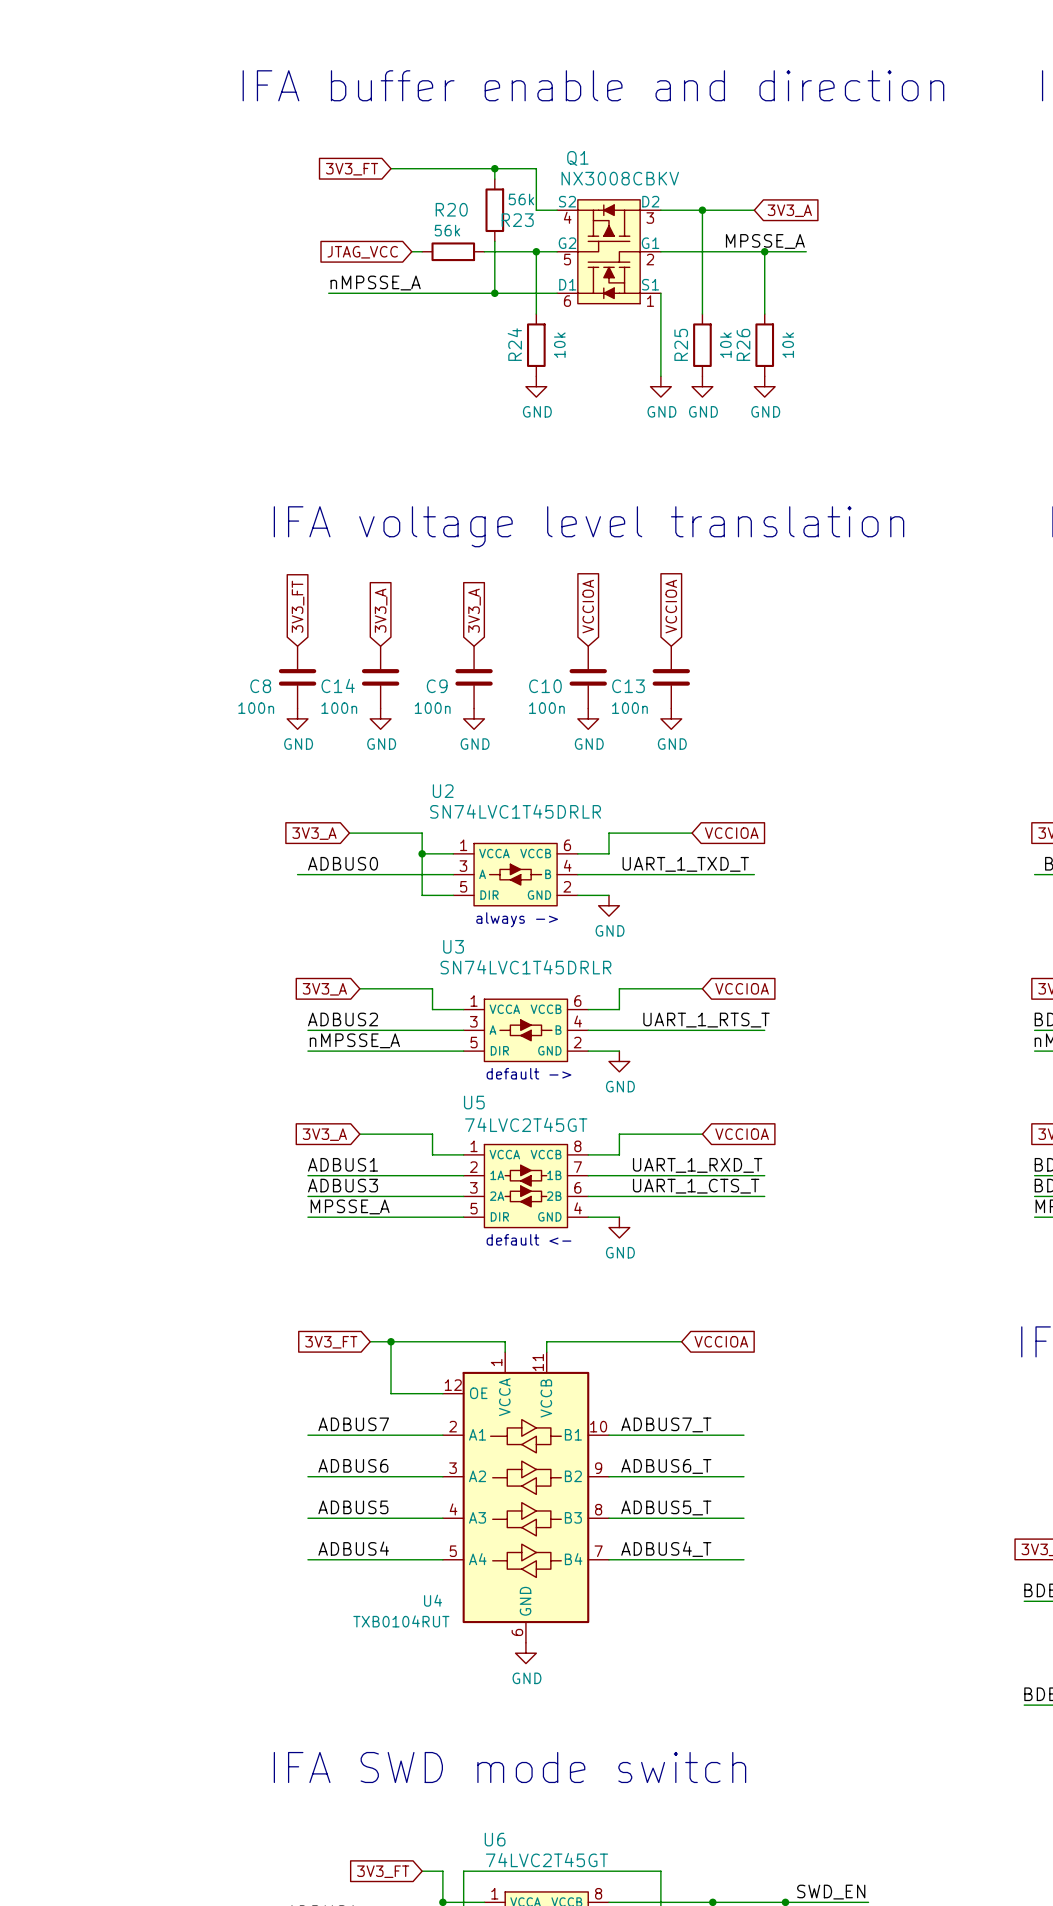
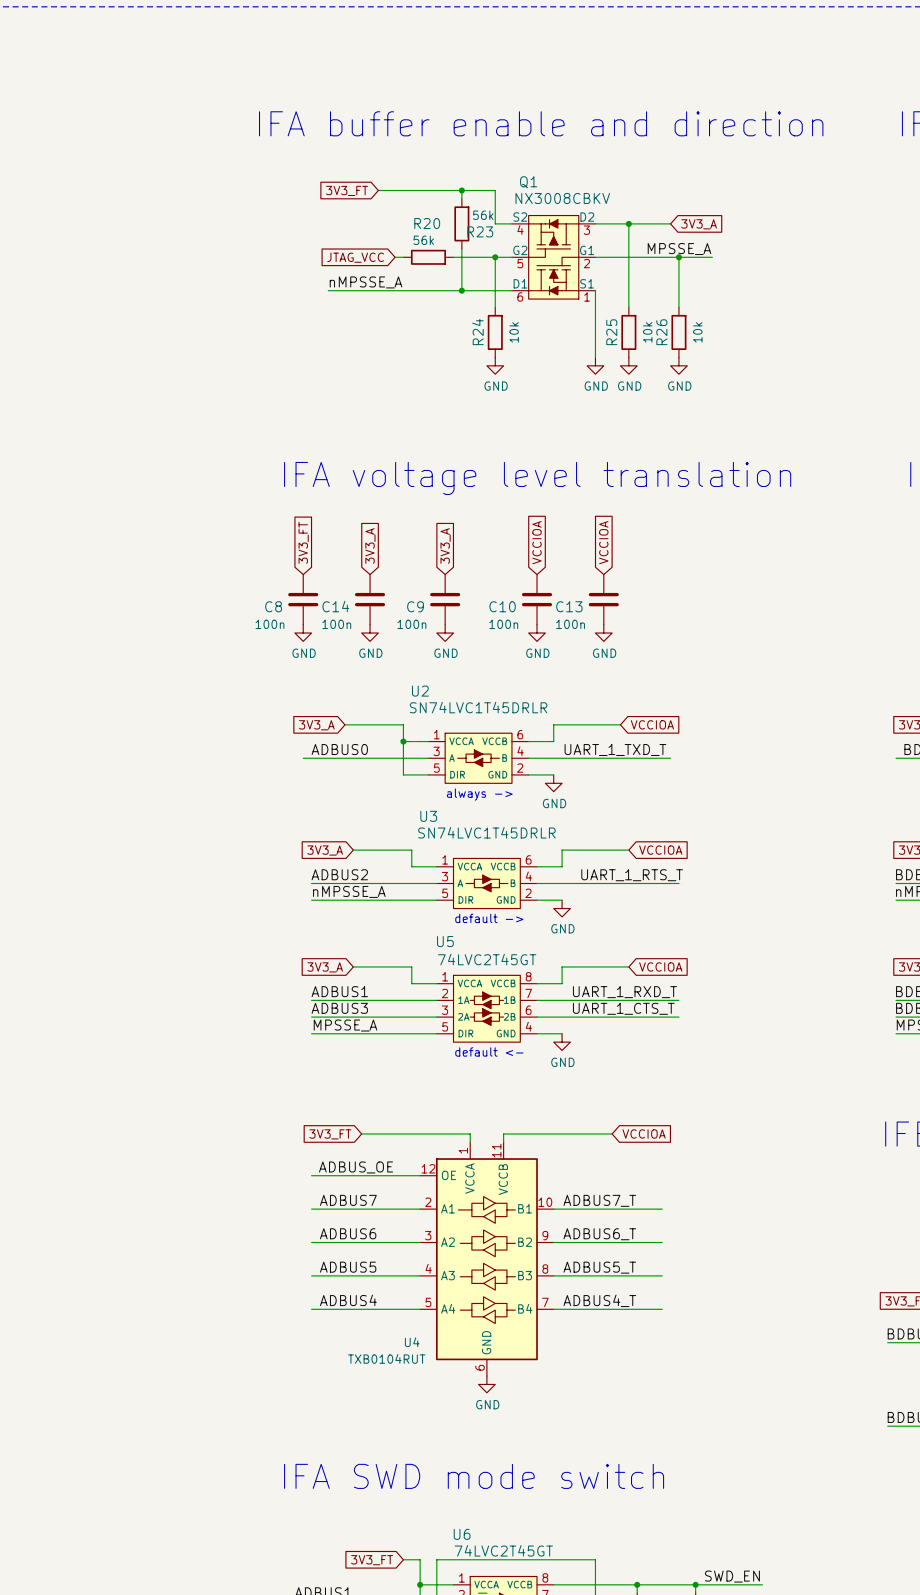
wire: (391, 1341) (391, 1393) -> (311, 1175) (378, 1175)
junction: (391, 1341) -> none
label: none -> ADBUS_OE (356, 1167)

